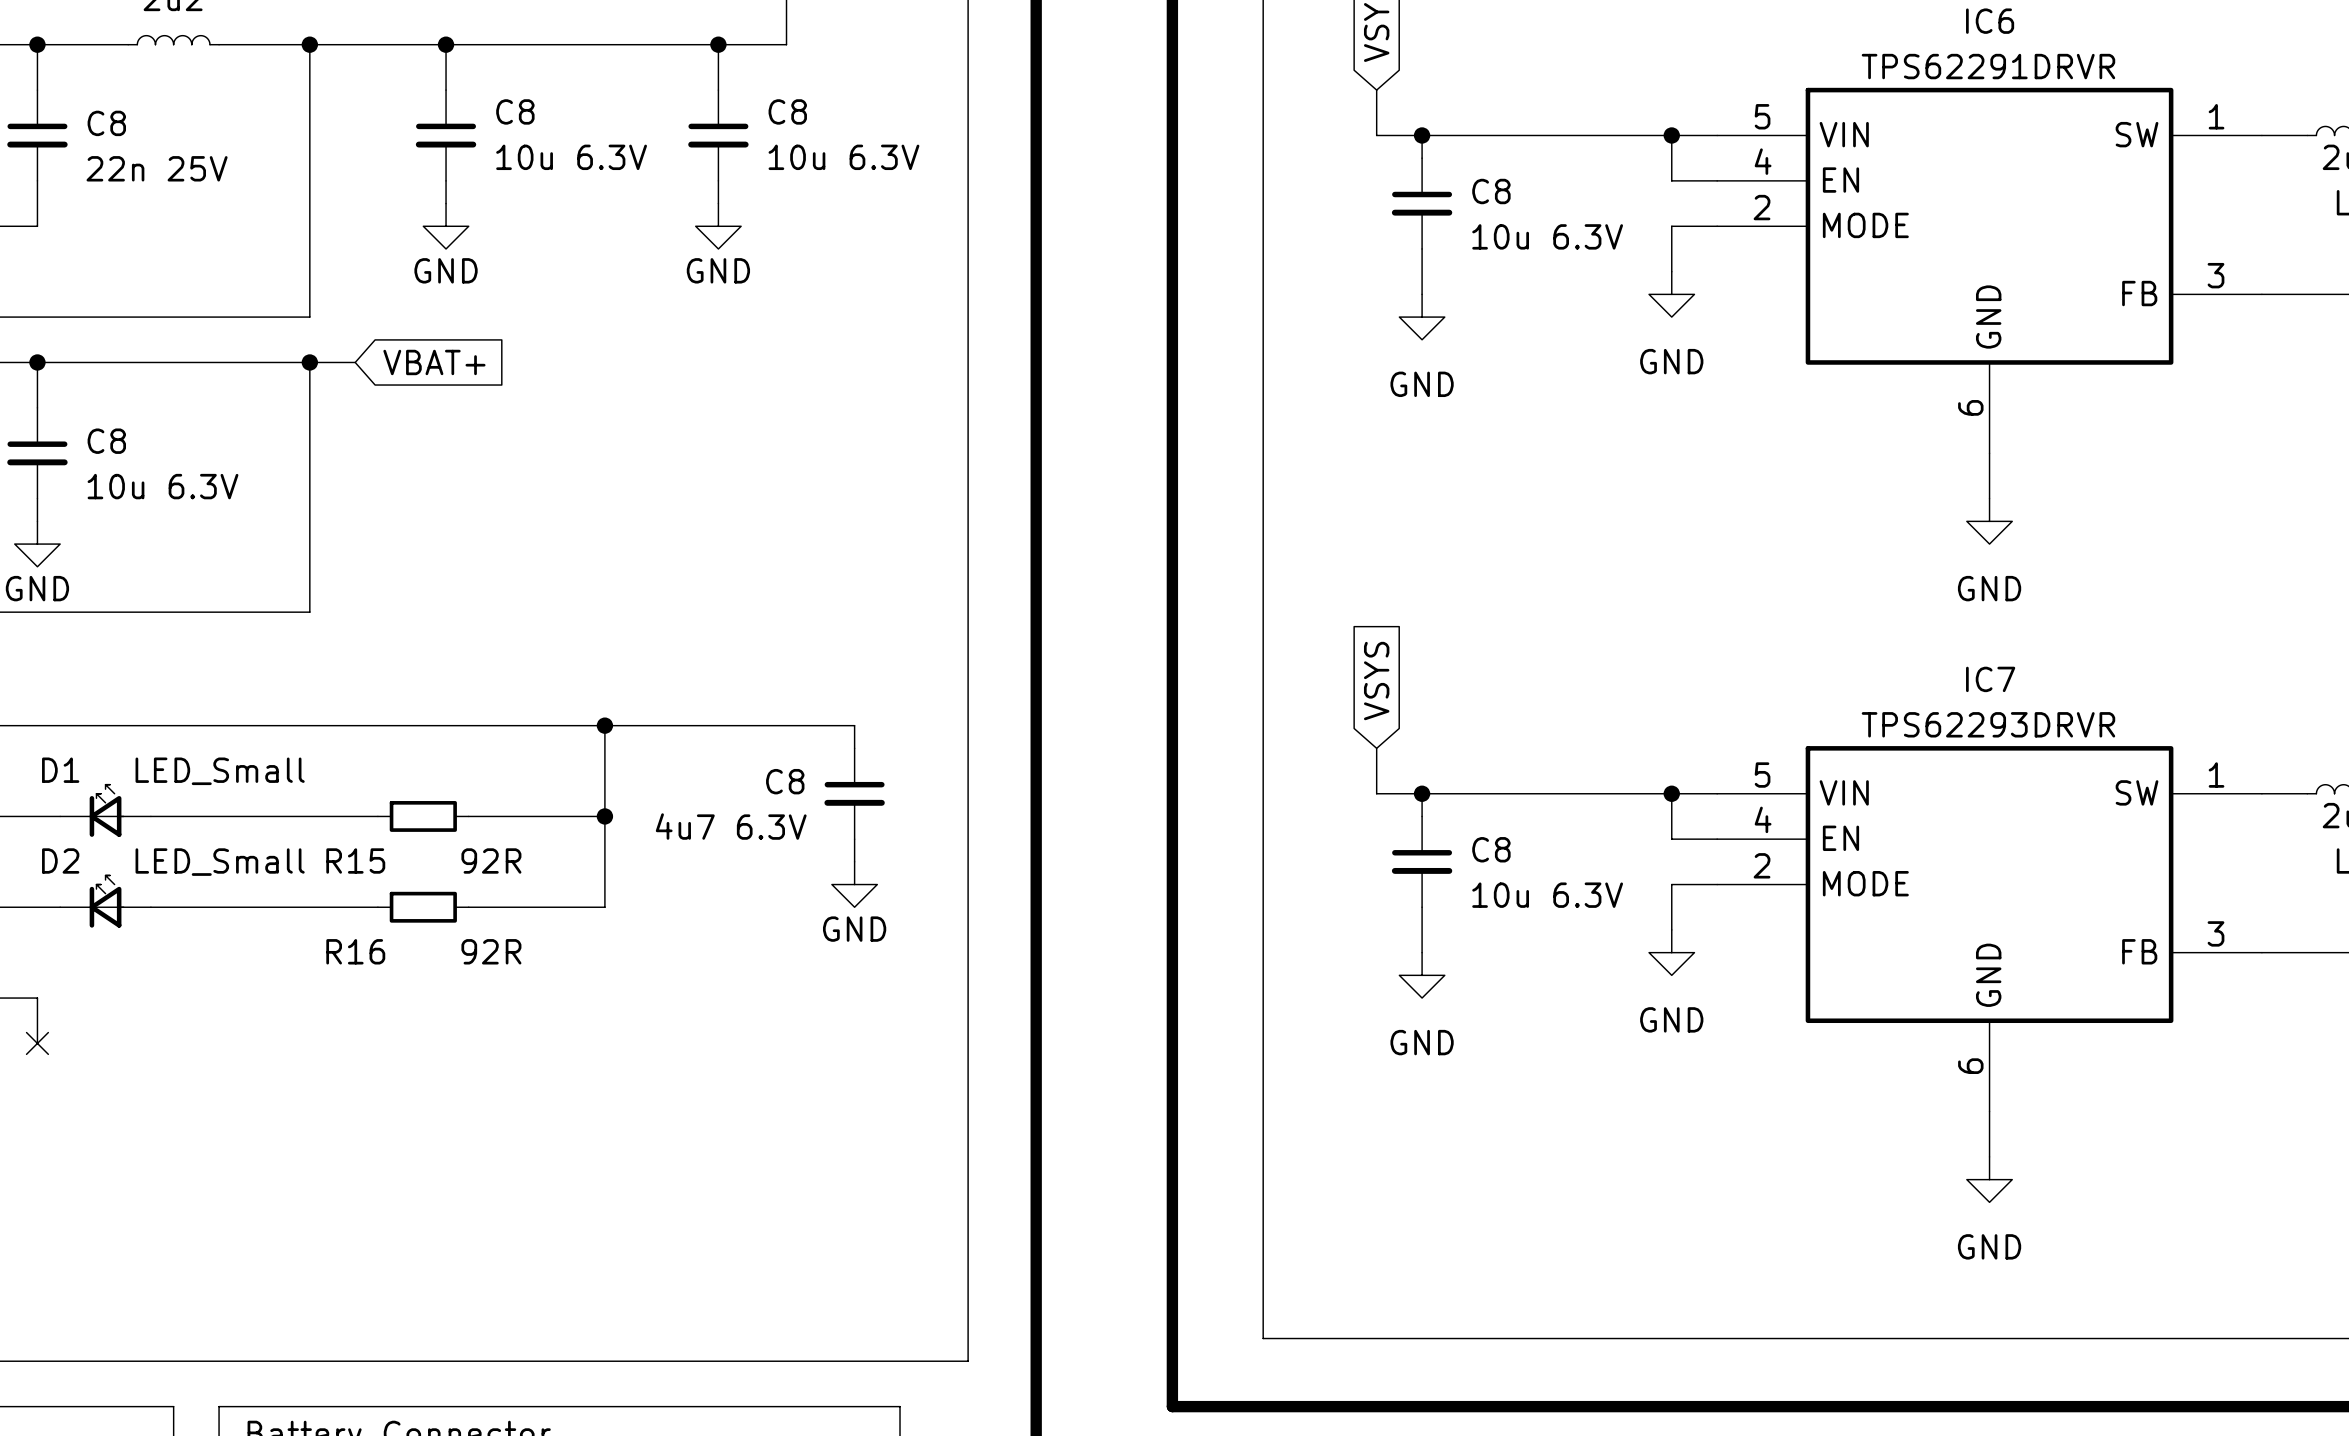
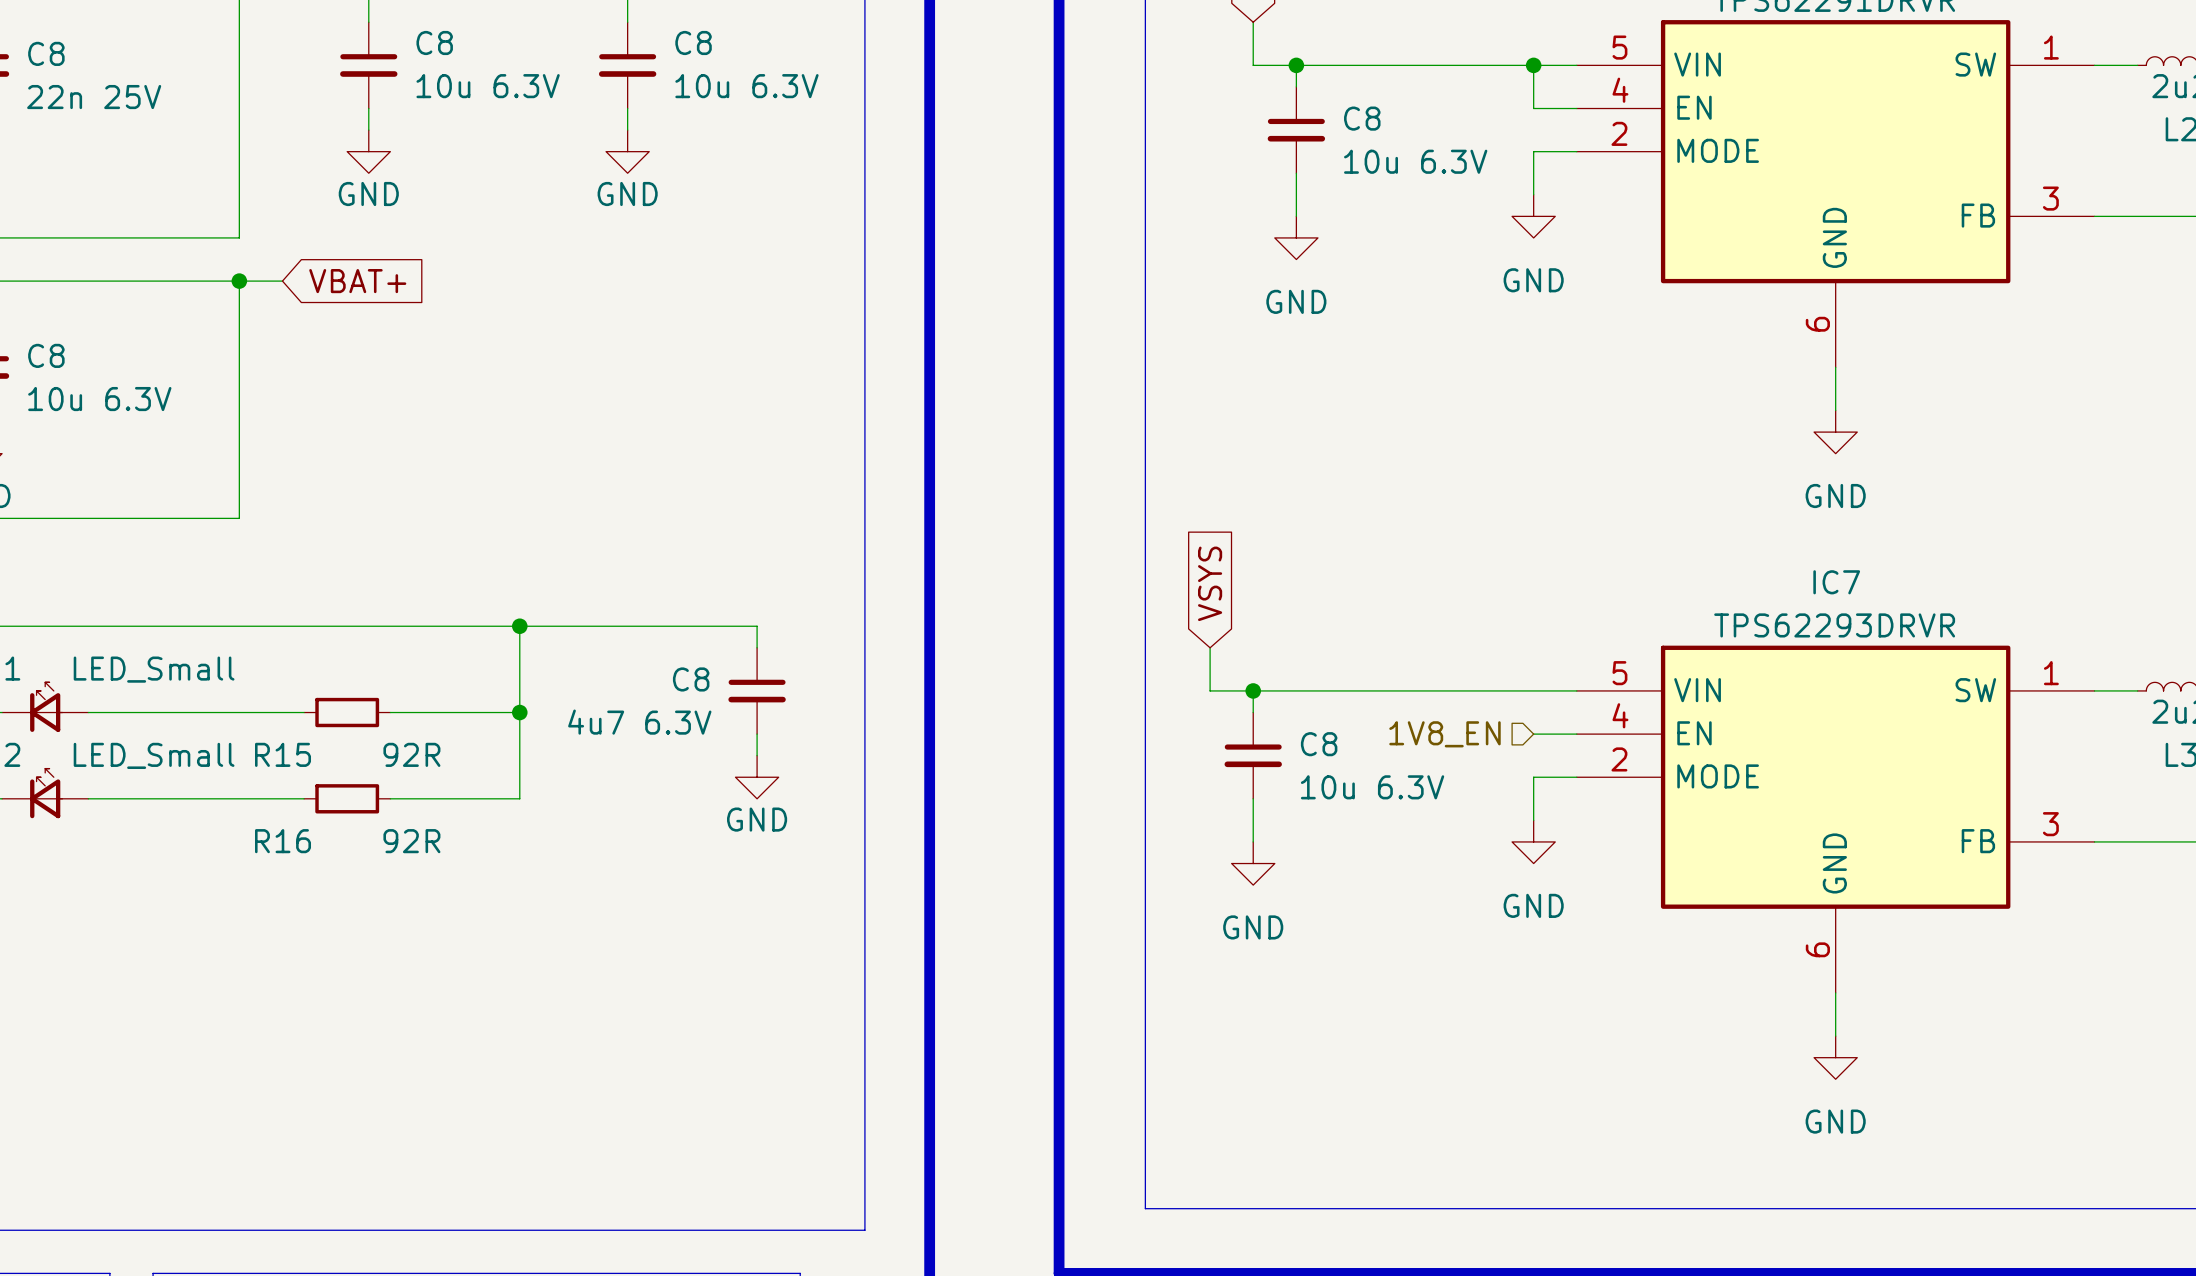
global label position: VSYS (1376, 681) -> VSYS (1210, 583)
wire: none -> (1210, 647) (1210, 690) (1253, 690) (1253, 712)
wire: (1376, 748) (1376, 793) -> none
wire: (1422, 793) (1422, 816) -> none
junction position: (1422, 793) -> (1253, 690)
wire: (1671, 793) (1671, 839) -> none
junction: (1671, 793) -> none
hierarchical label: none -> 1V8_EN (1444, 734)
C8 position: (1422, 861) -> (1253, 755)
wire: (1422, 907) (1422, 952) -> (1253, 798) (1253, 841)
power symbol position: GND (1422, 975) -> GND (1253, 863)

